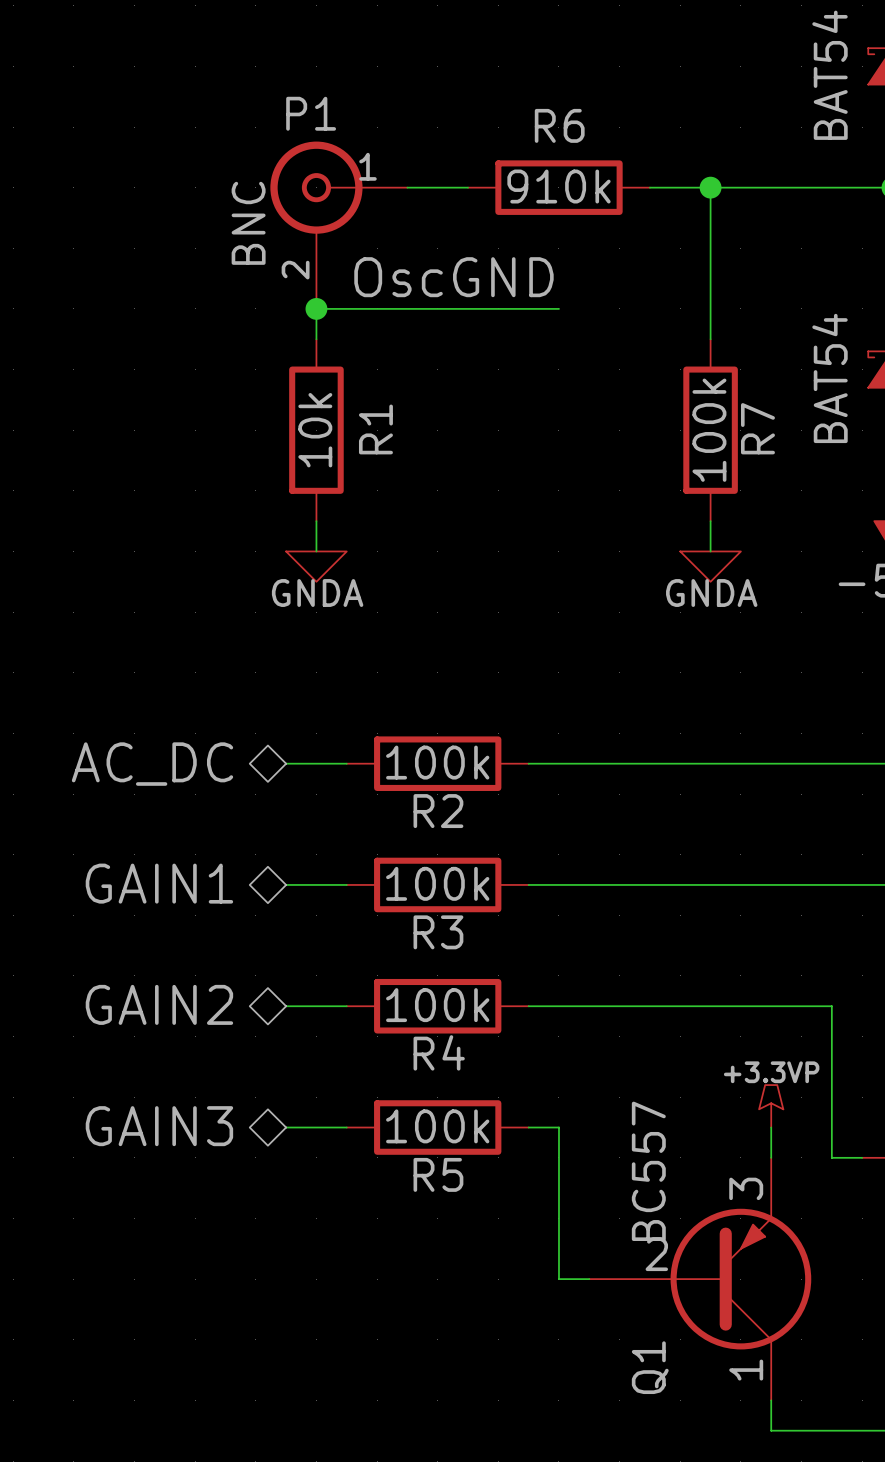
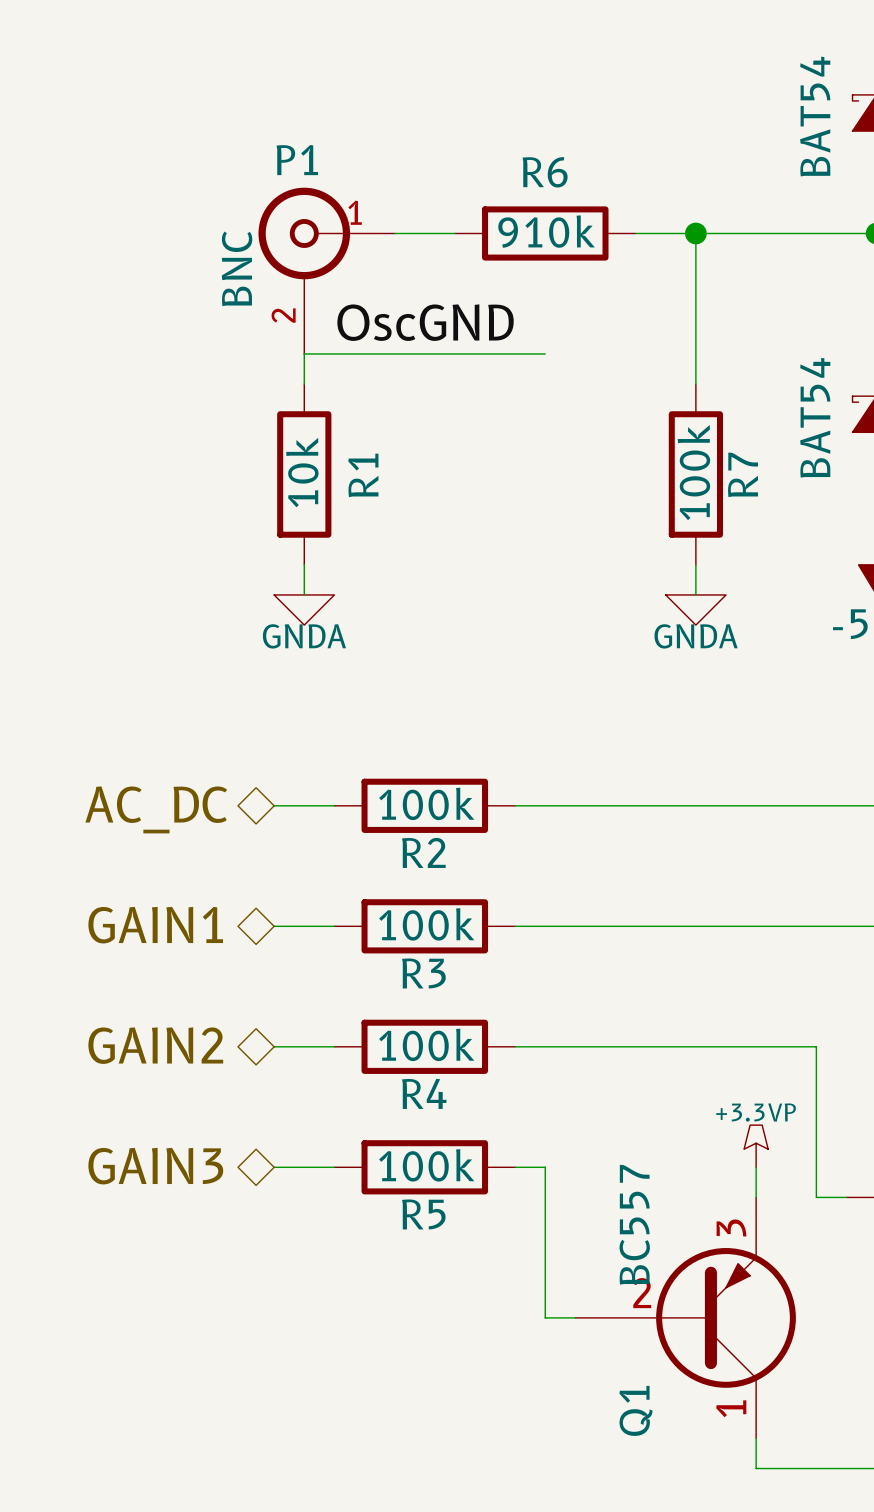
junction: (316, 308) -> none

